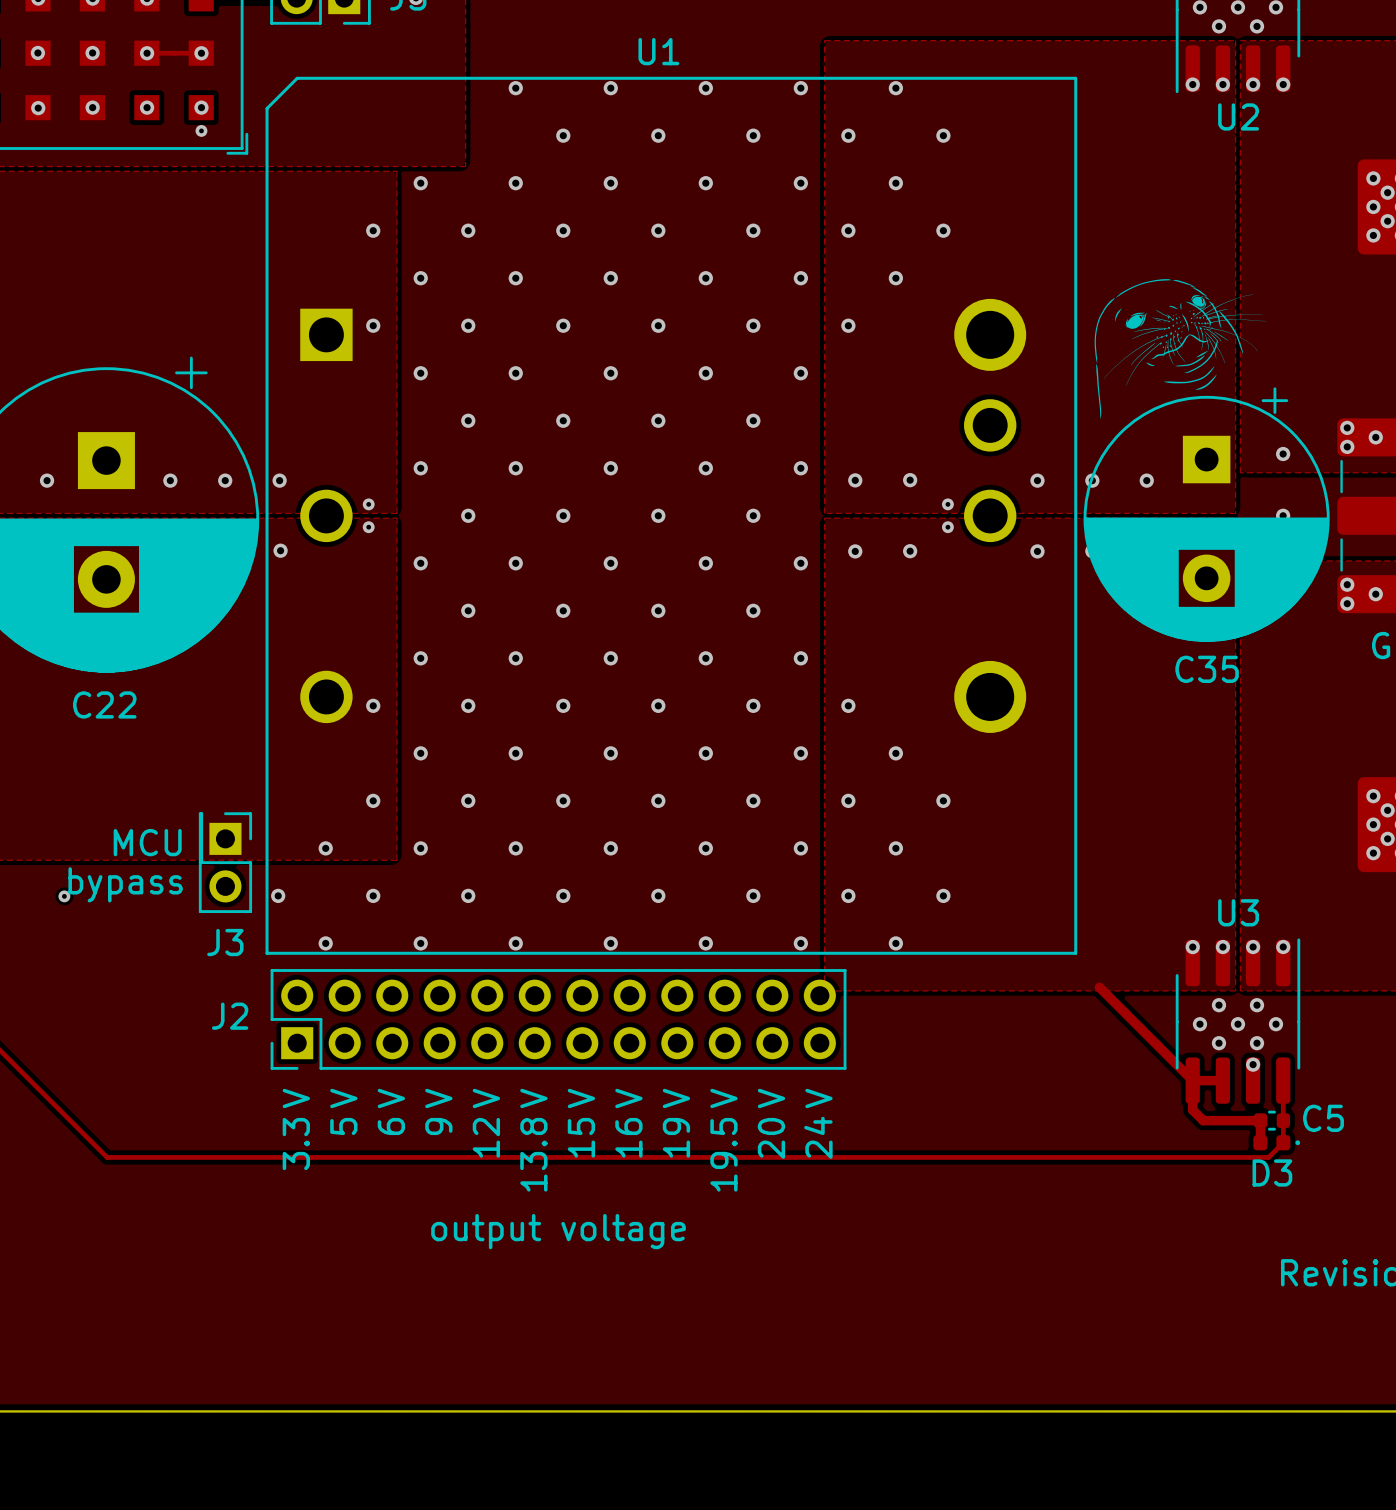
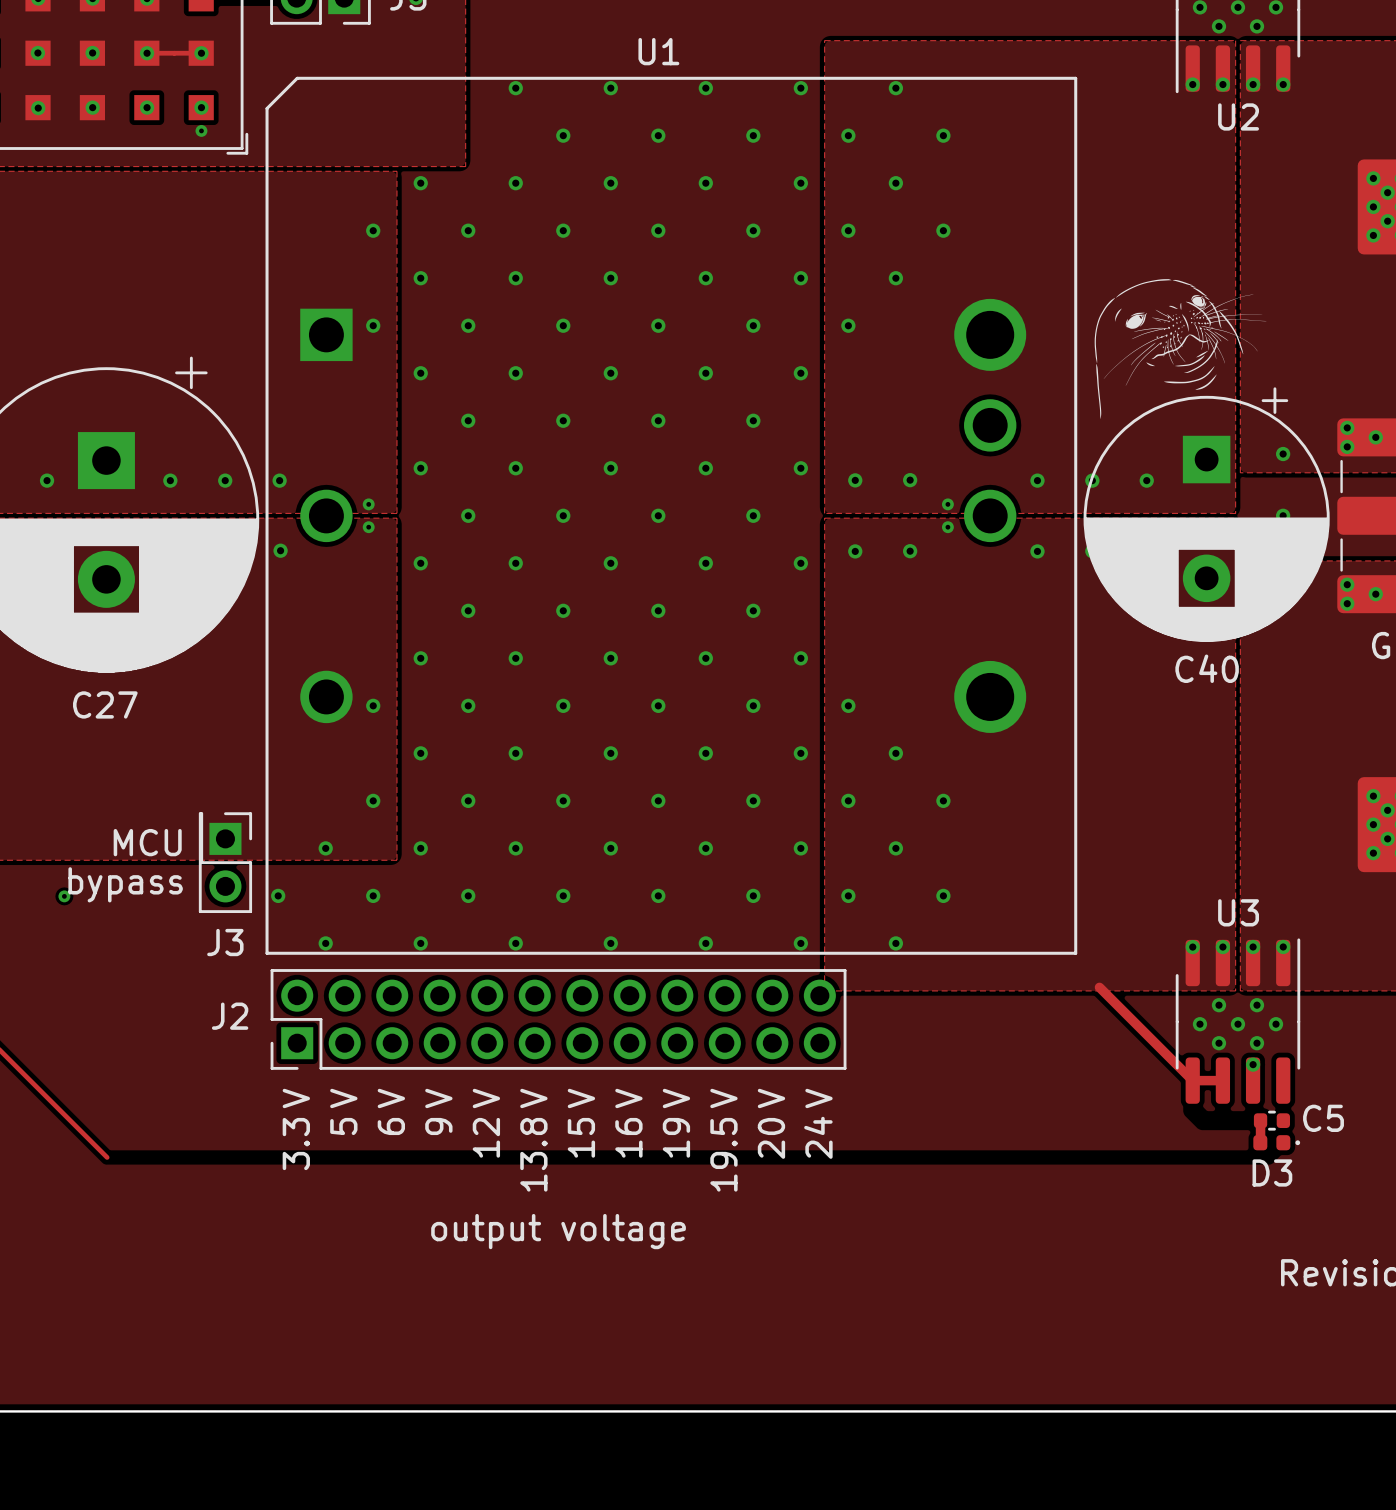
C35 name: C35 (1207, 669) -> C40 (1207, 668)
C22 name: C22 (104, 704) -> C27 (105, 704)
track: (1192, 1080) (1192, 1110) (1203, 1120) (1260, 1120) -> none
track: (1283, 1080) (1283, 1142) (1268, 1157) (107, 1157) -> none

